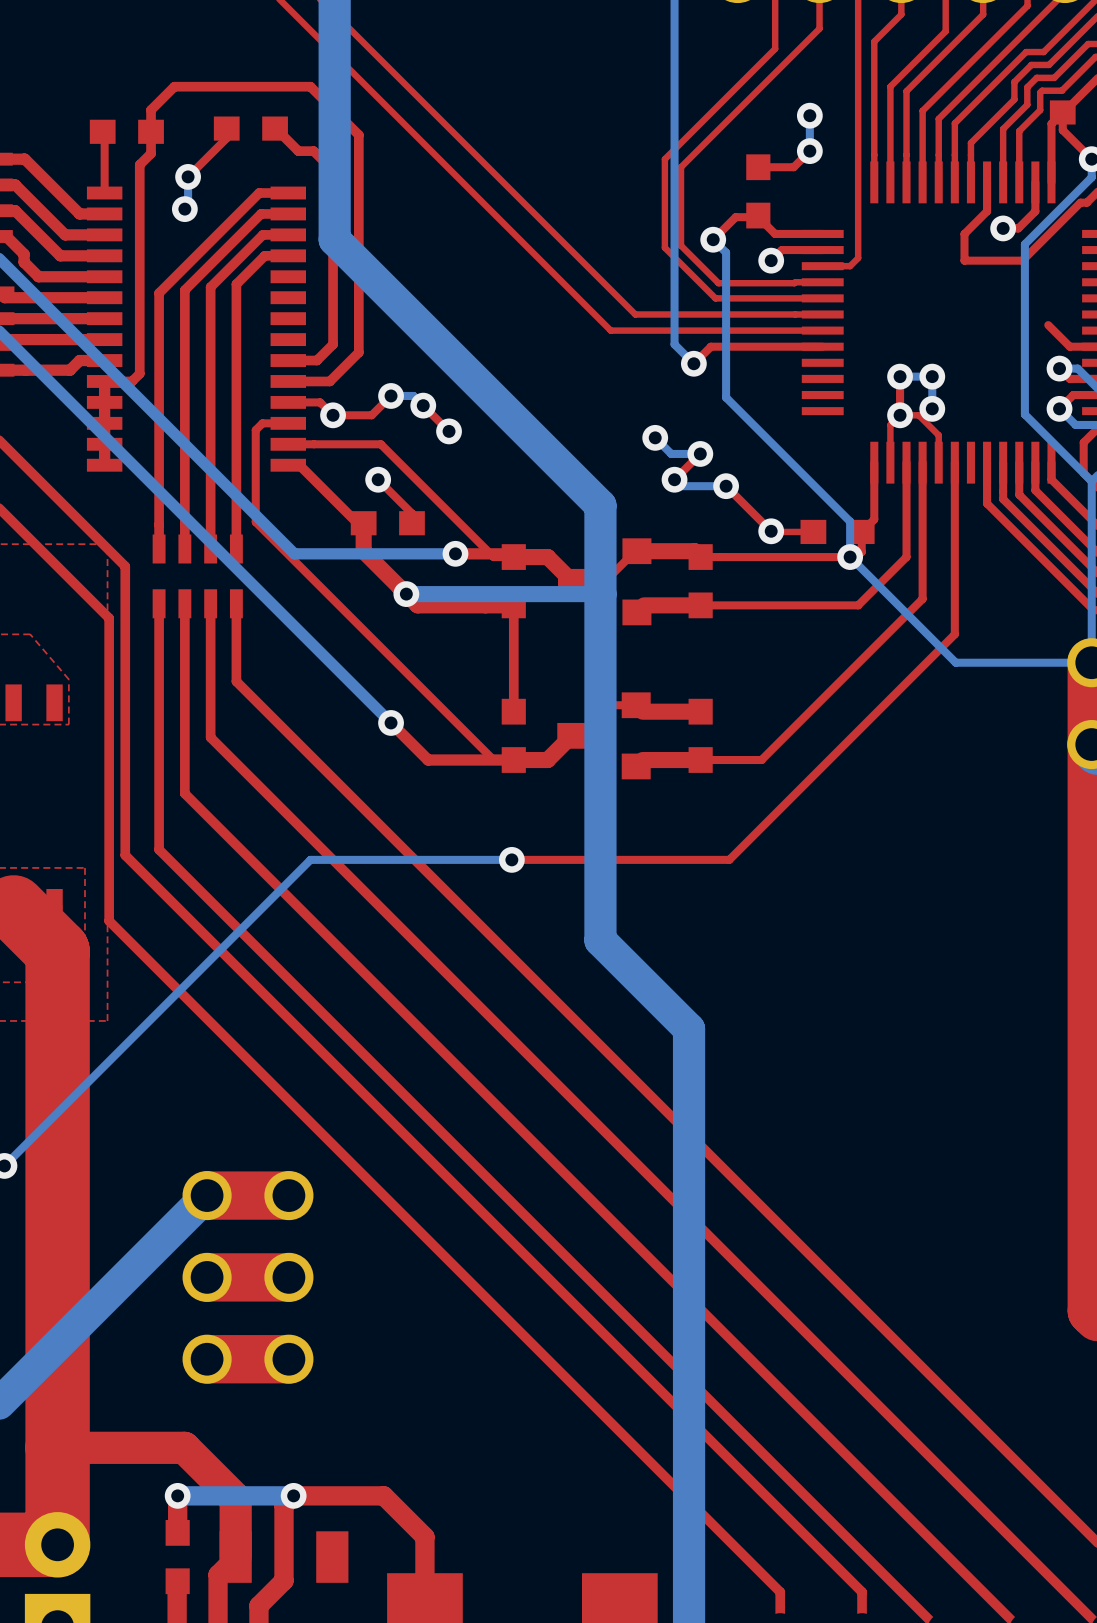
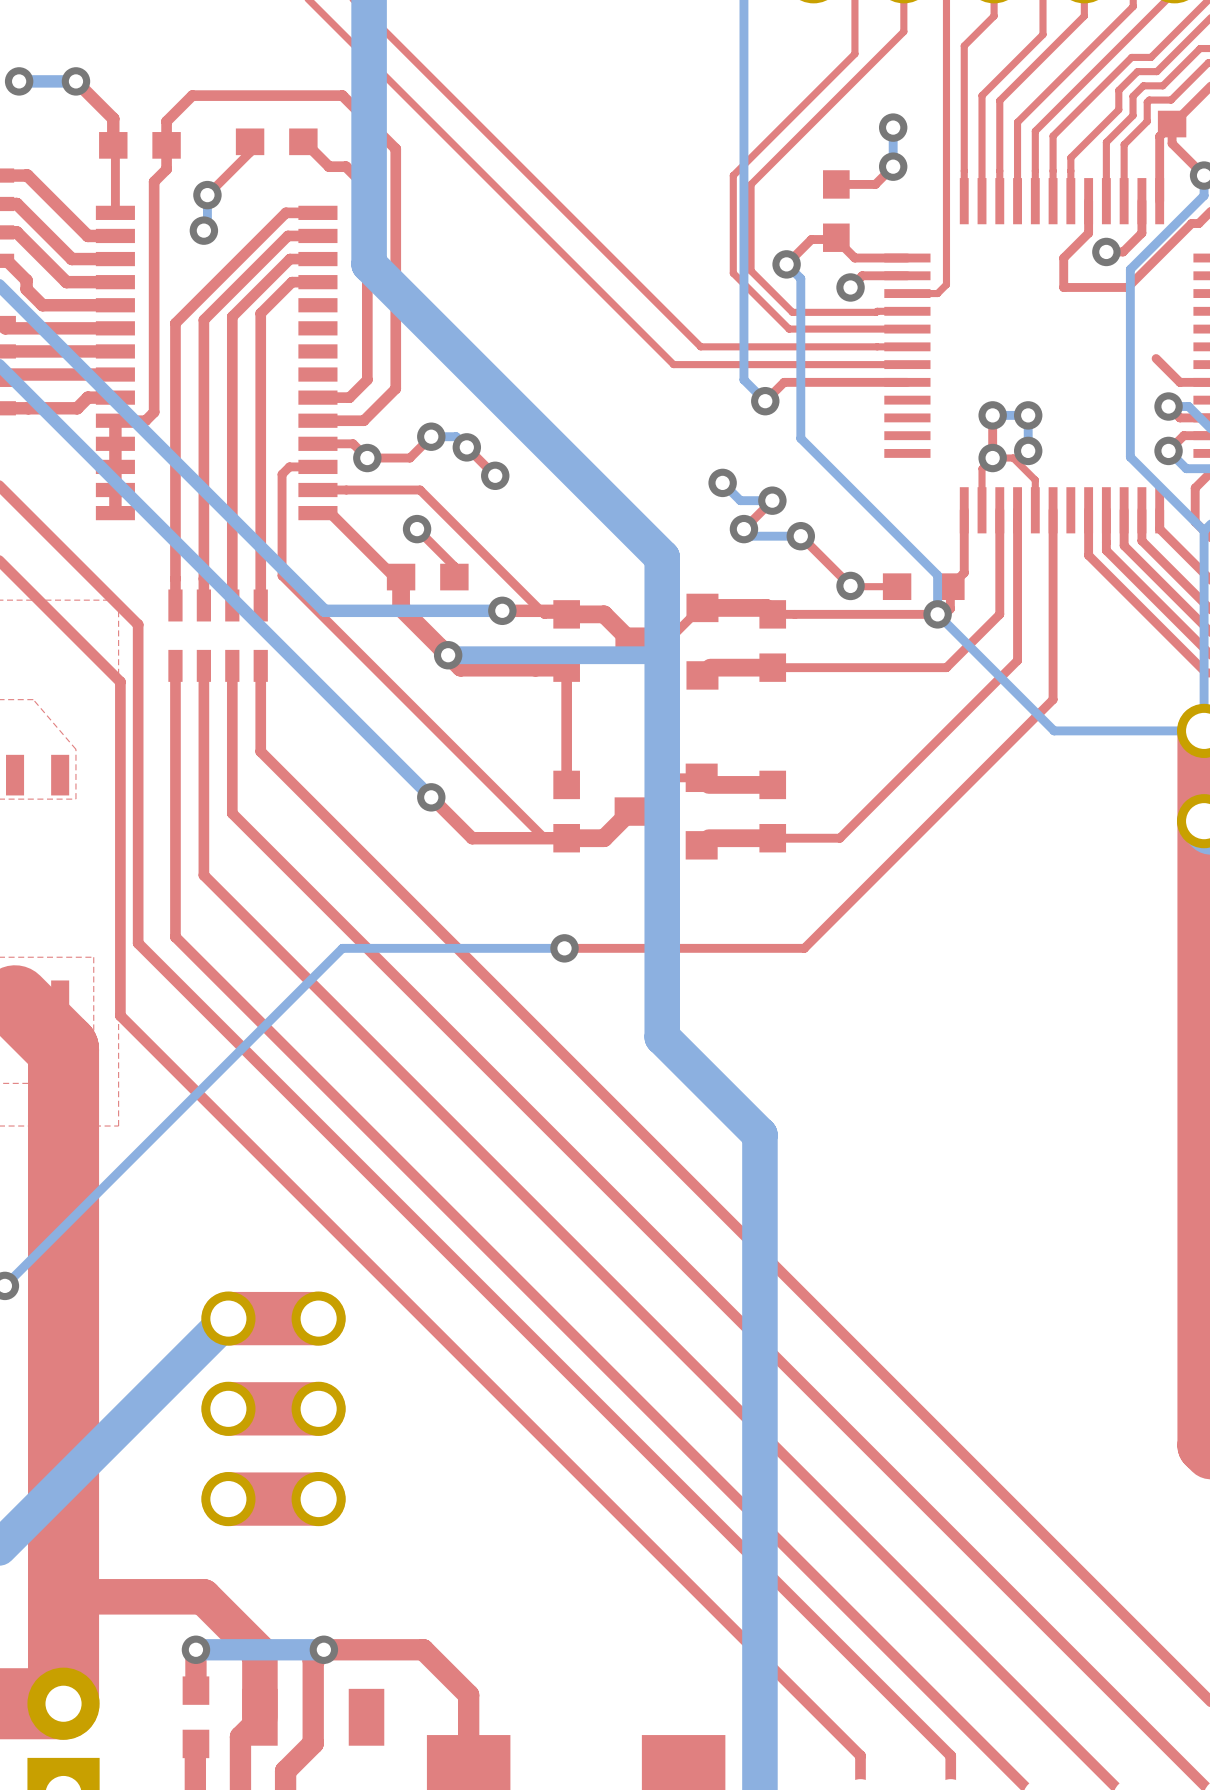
via: none -> (19, 81)
top track: none -> (75, 81) (113, 118) (113, 145)
bottom track: none -> (75, 81) (19, 81)
via: none -> (75, 81)

